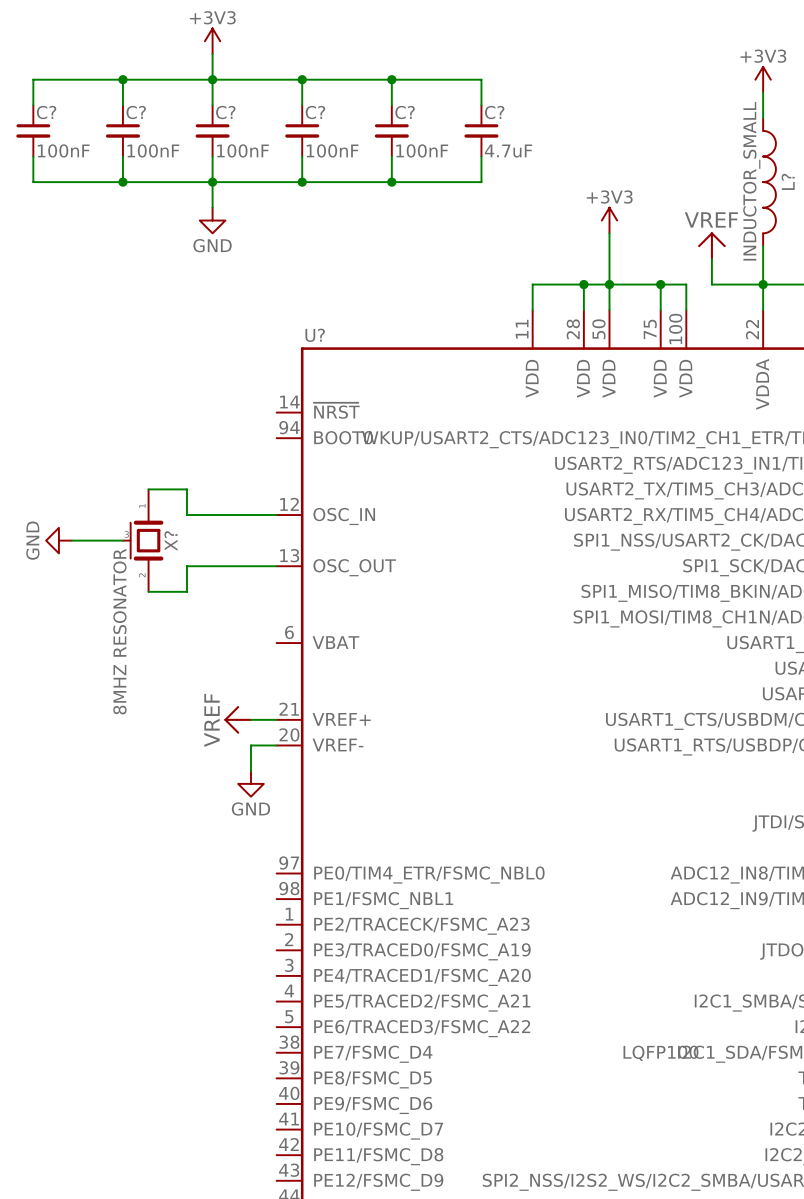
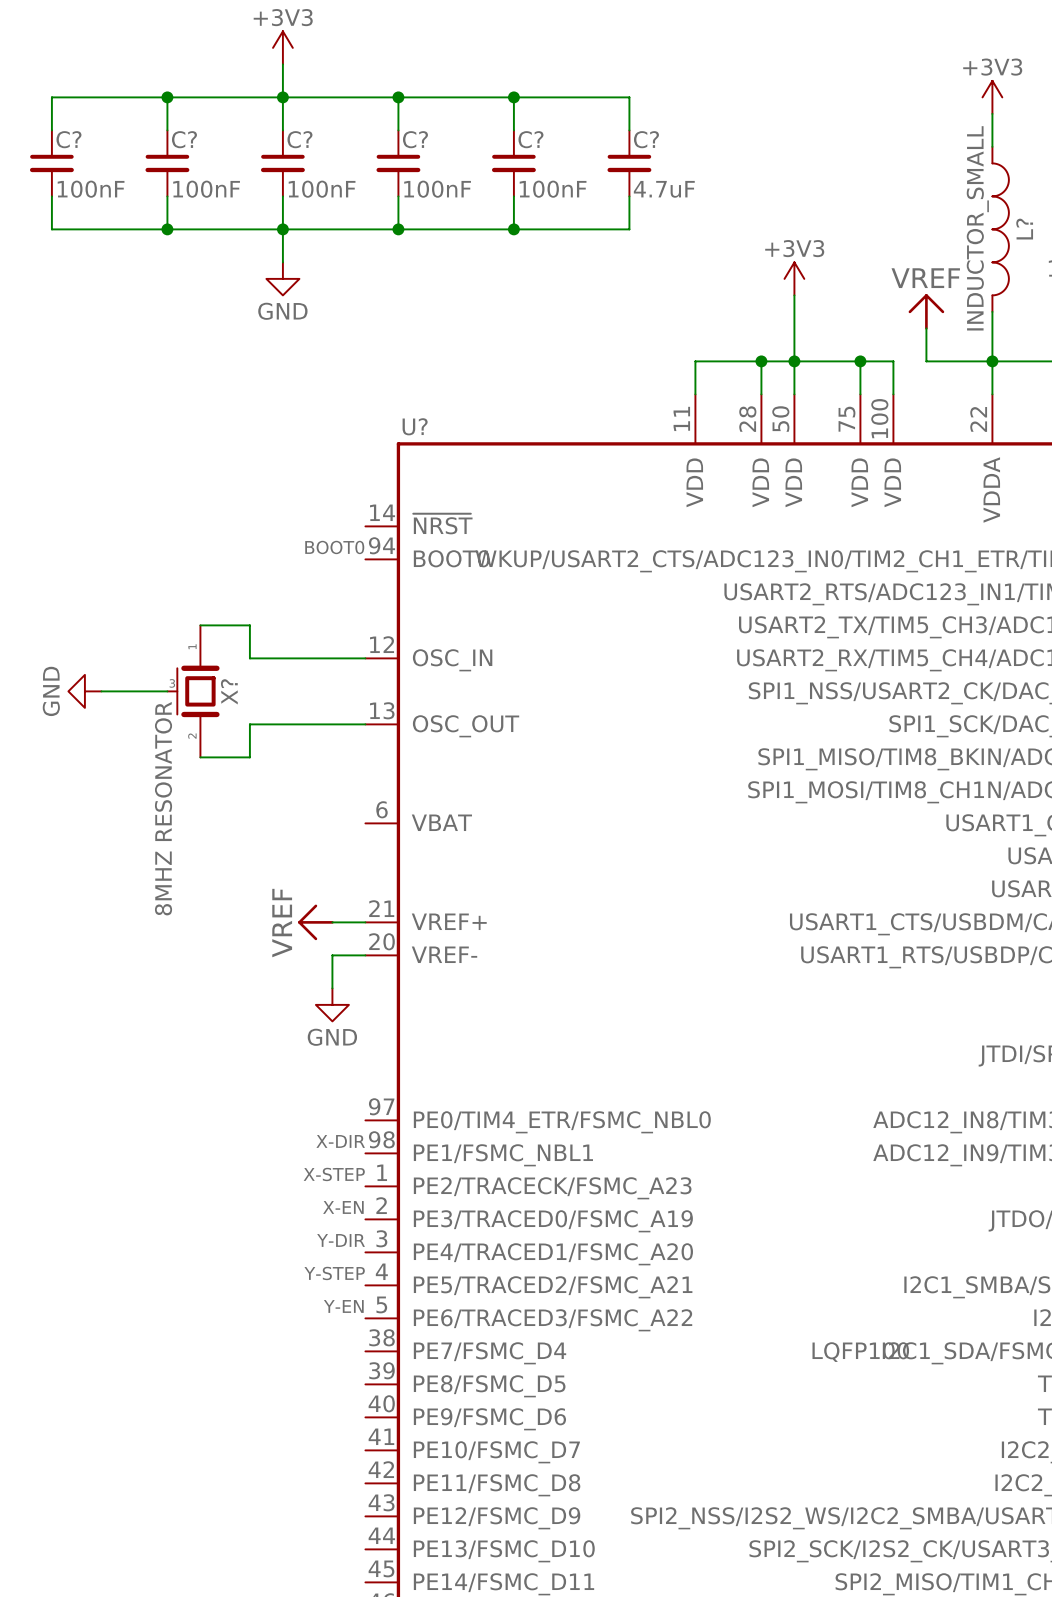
label: none -> BOOT0 (334, 547)
label: none -> X-DIR (340, 1141)
label: none -> X-STEP (334, 1174)
label: none -> X-EN (343, 1207)
label: none -> Y-DIR (341, 1240)
label: none -> Y-STEP (334, 1273)
label: none -> Y-EN (343, 1306)

